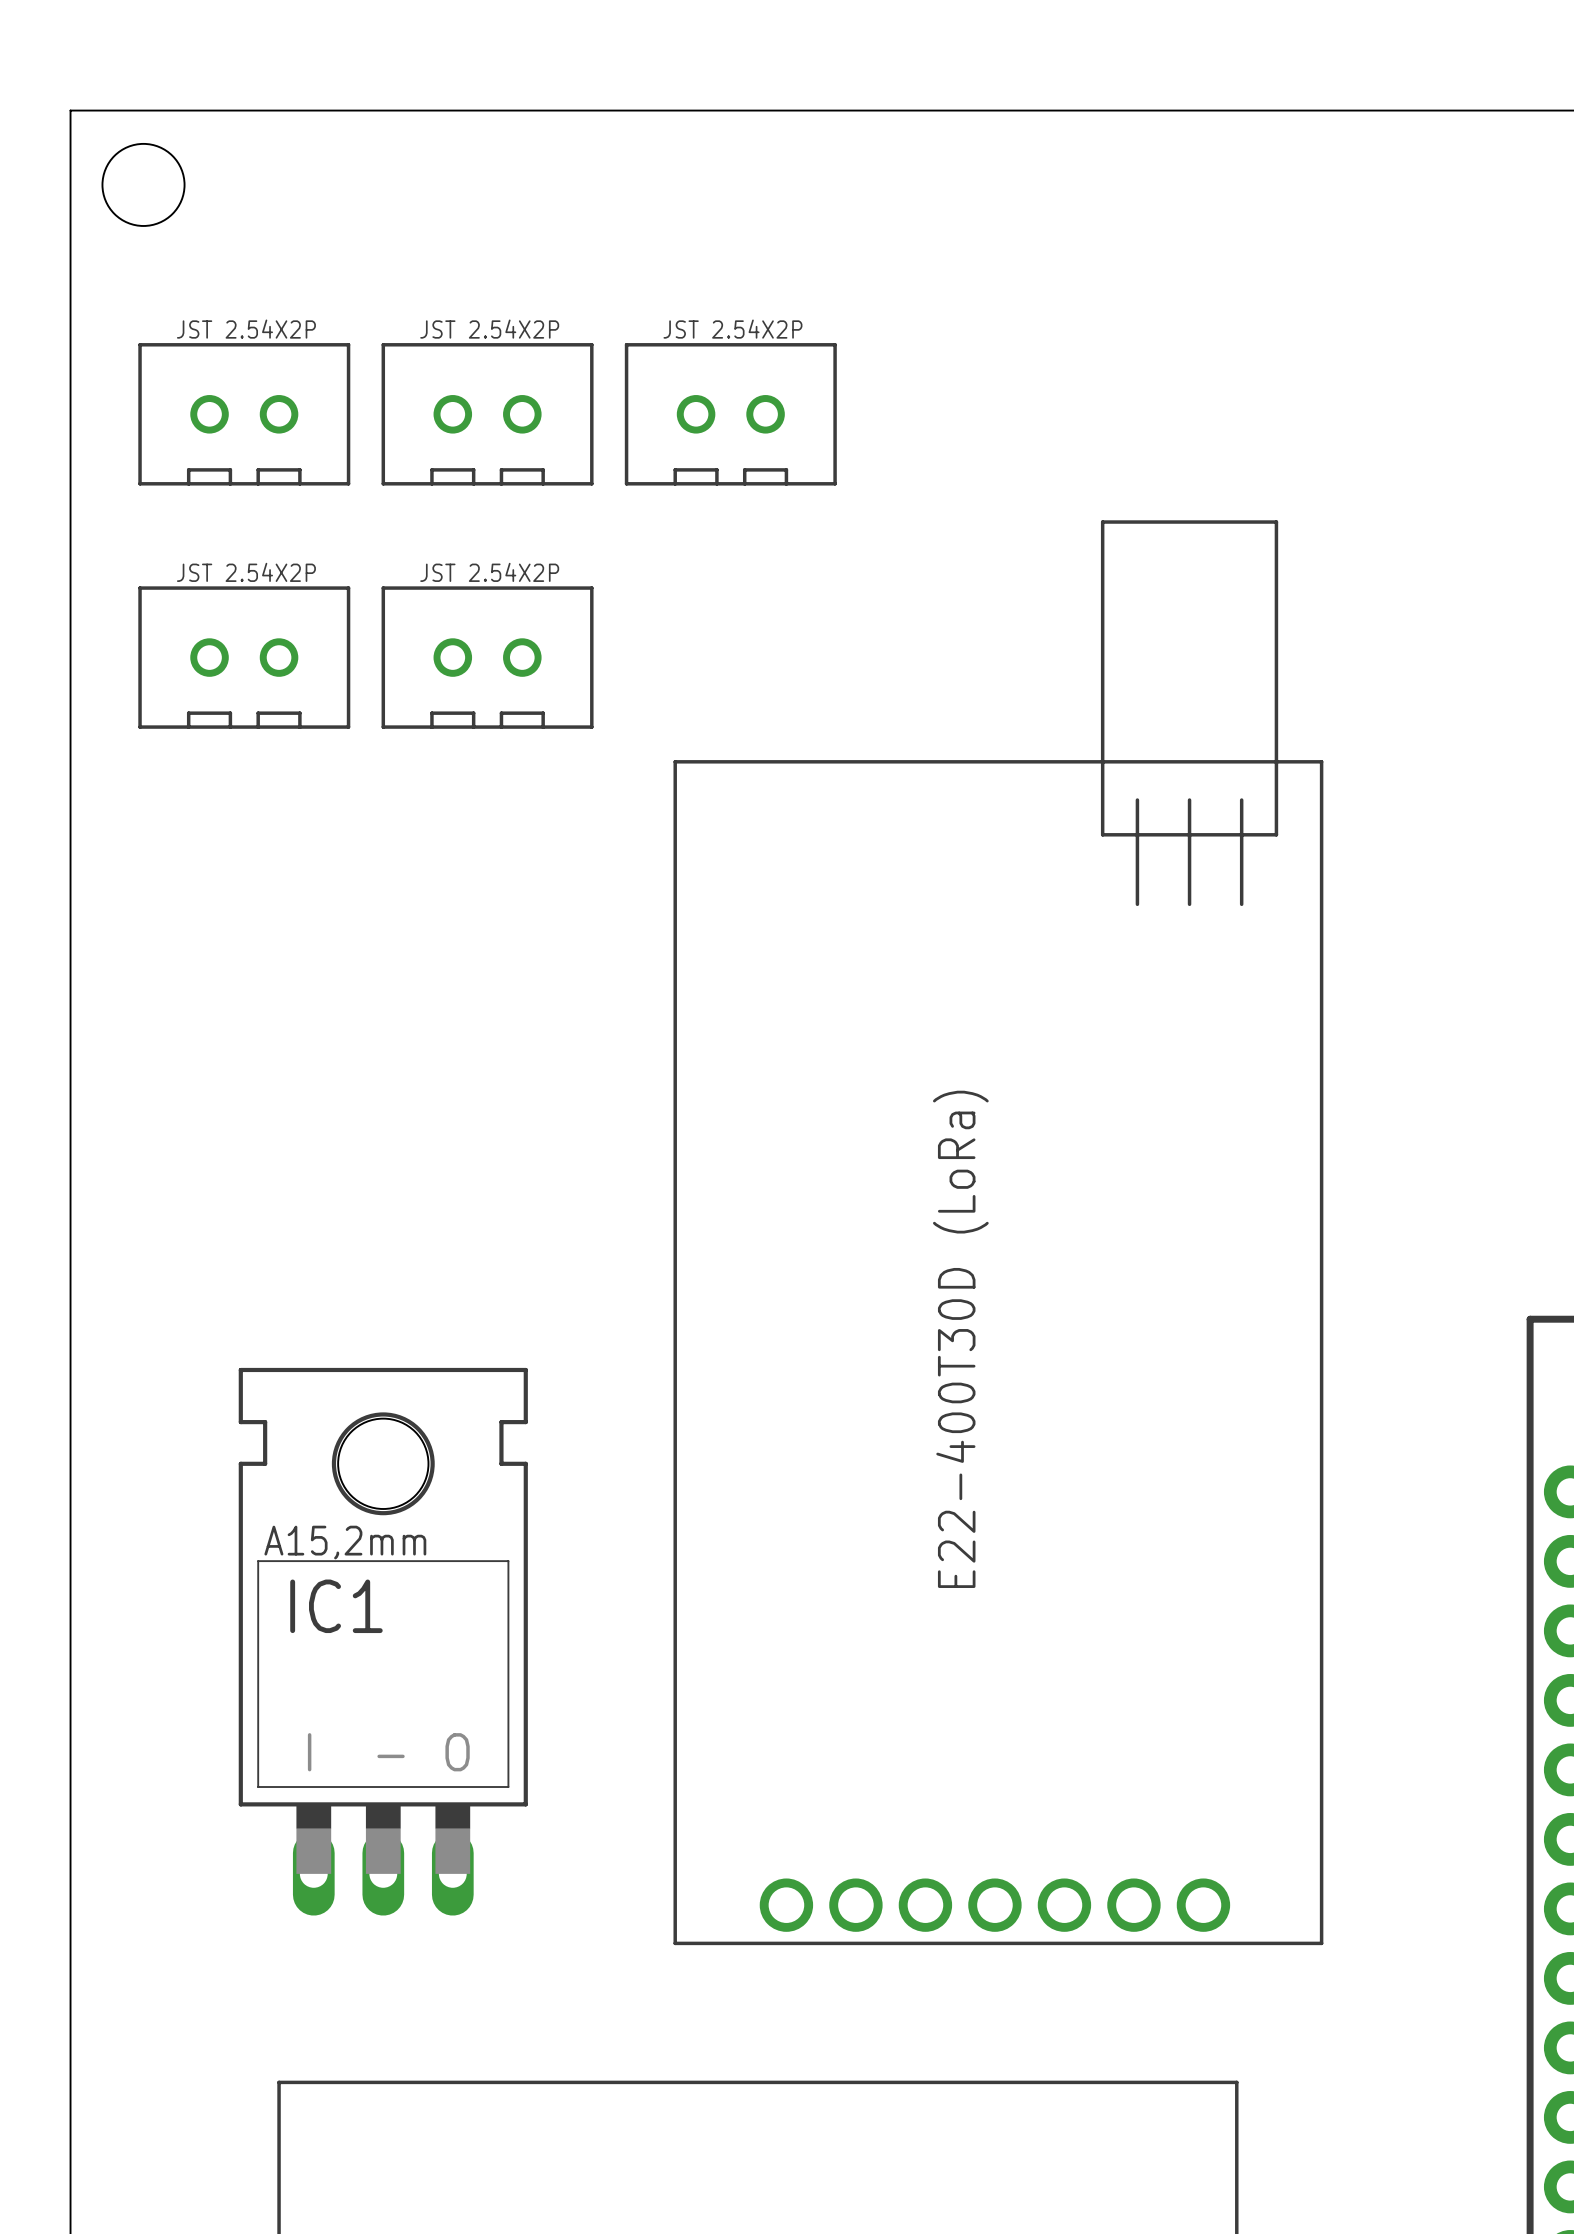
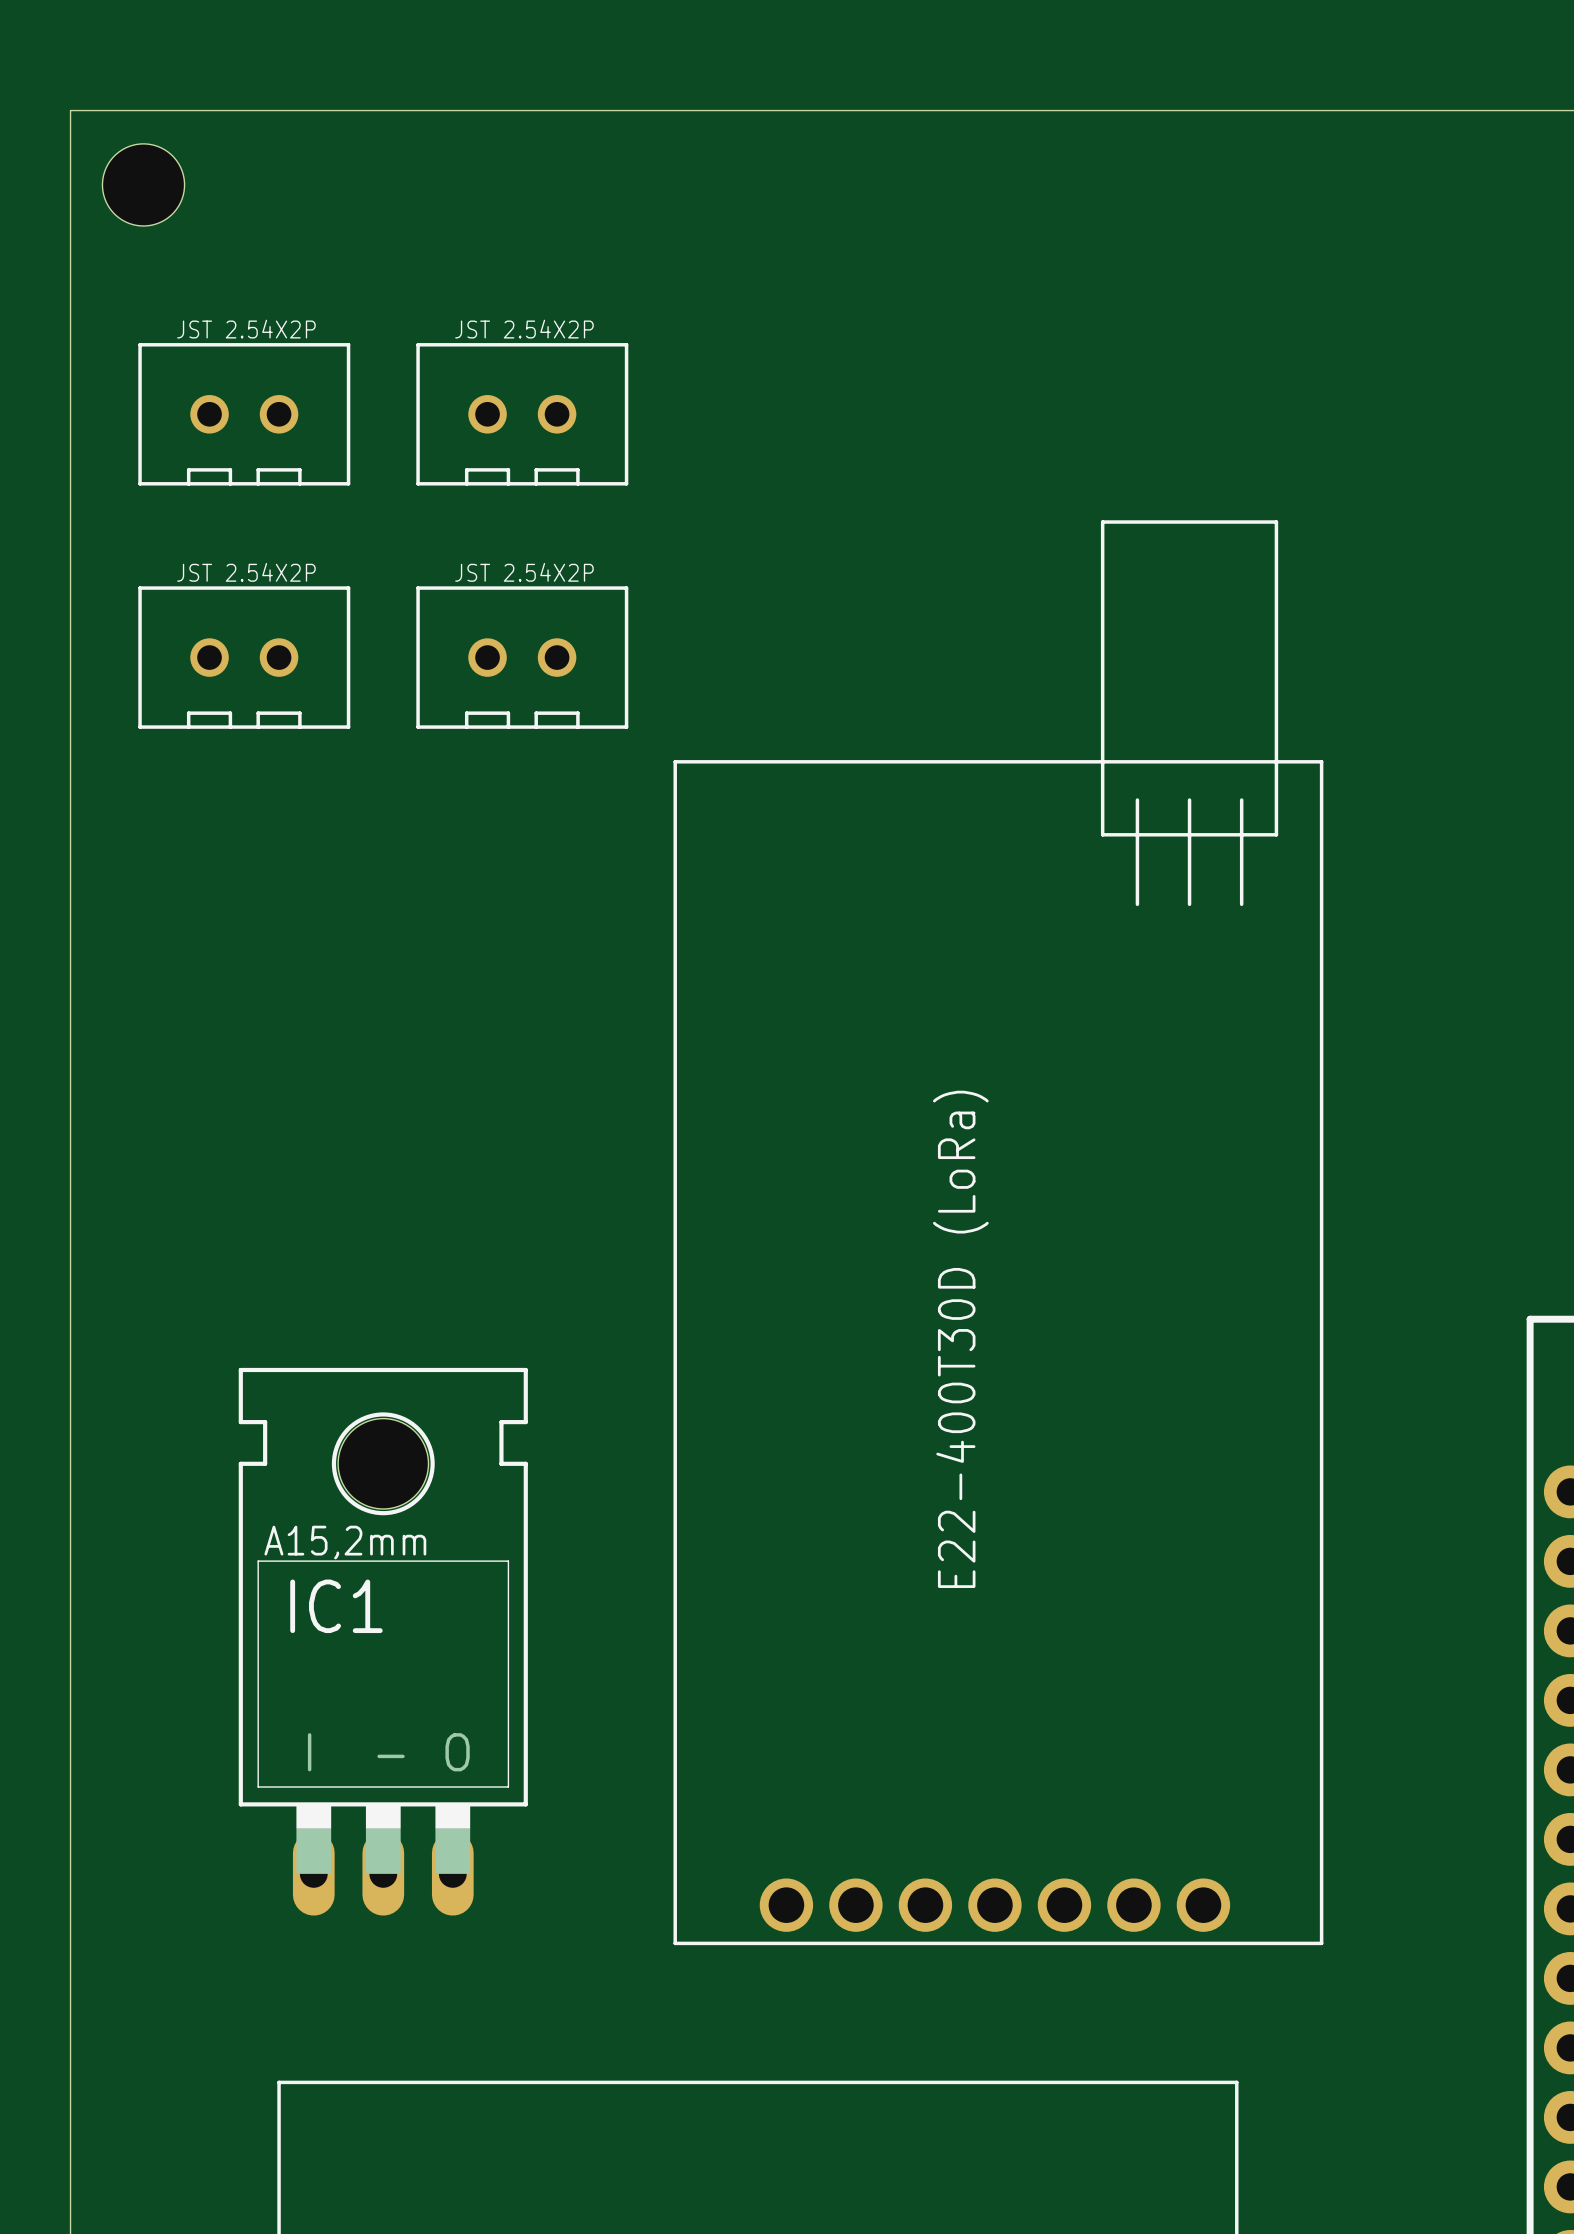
part position: (487, 414) -> (522, 414)
part: (730, 414) -> none
part position: (487, 657) -> (522, 657)

